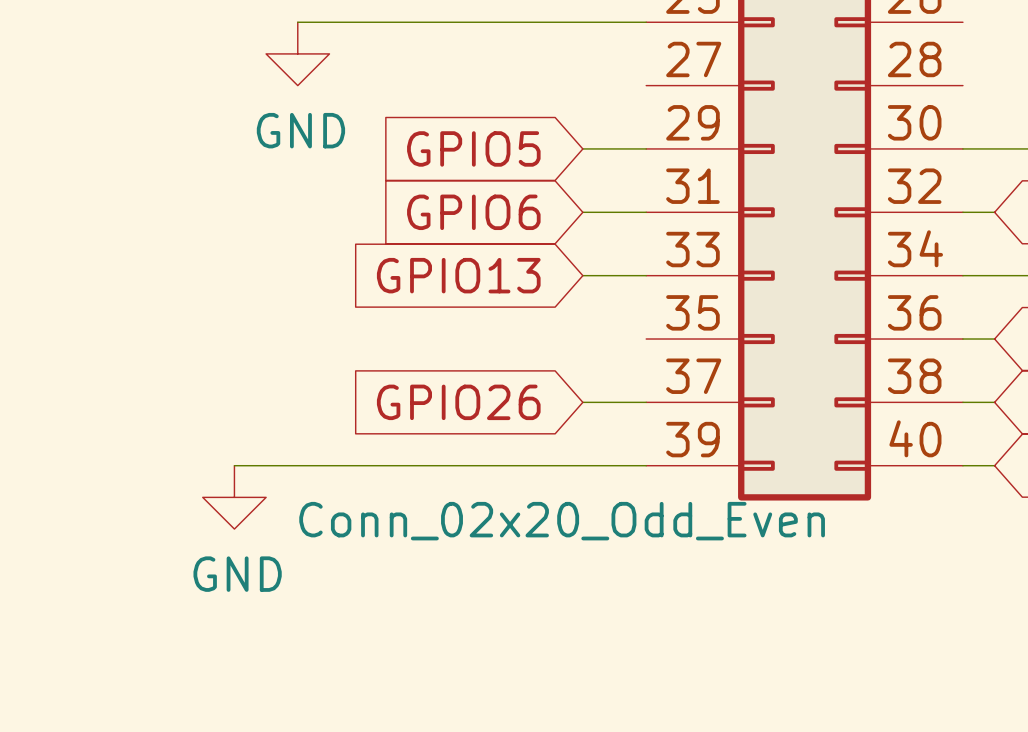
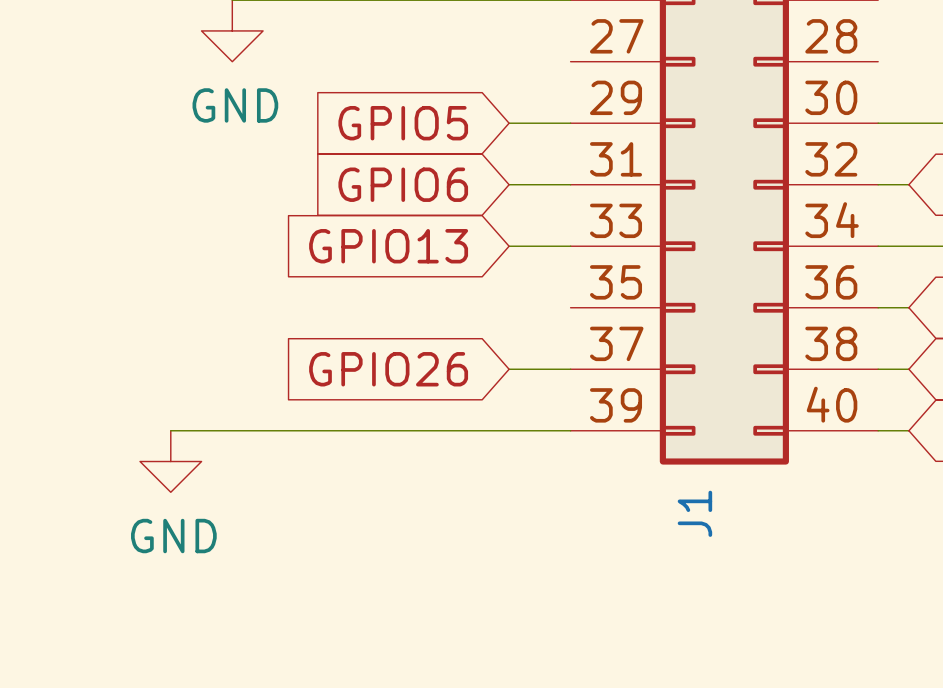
J1 value: Conn_02x20_Odd_Even (562, 521) -> none
J1 name: none -> J1 (694, 513)

